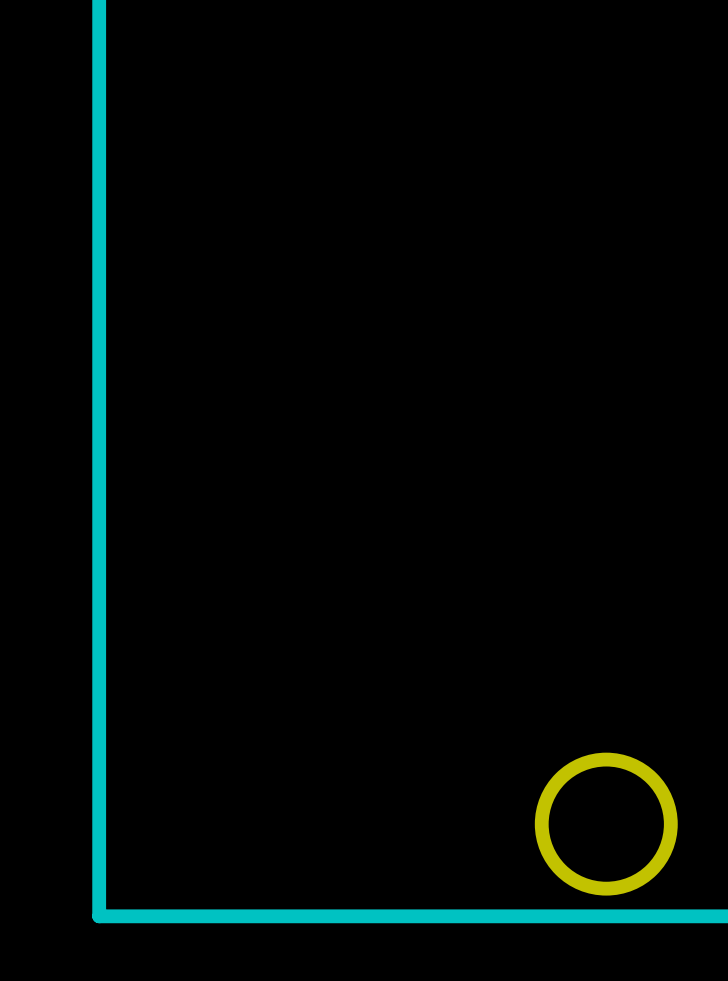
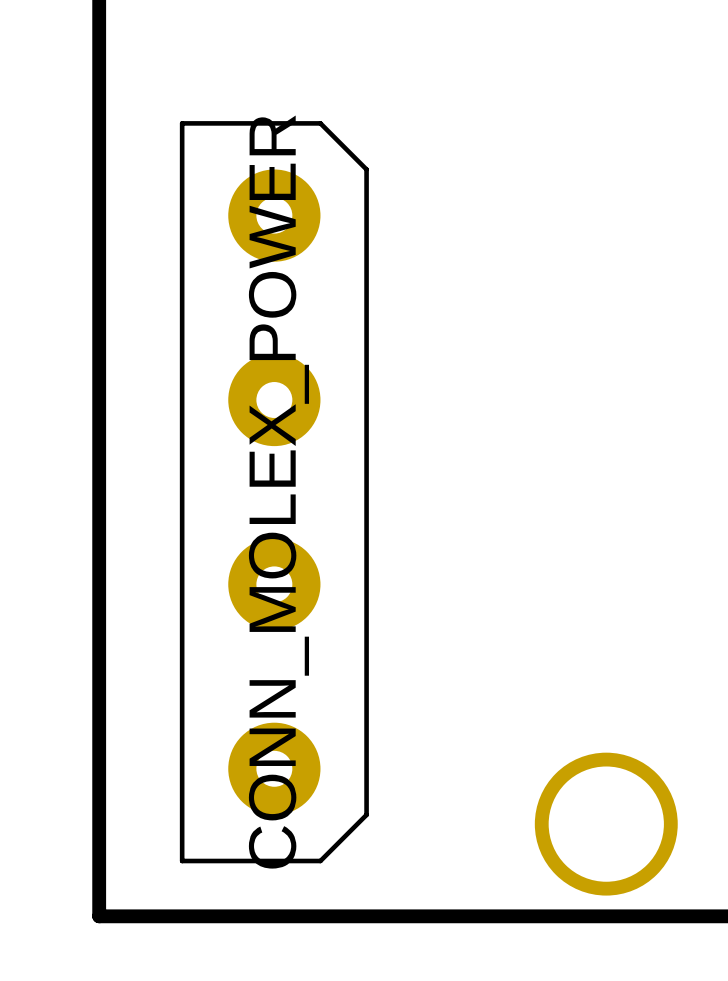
part: none -> CONN_MOLEX_POWER (274, 492)

